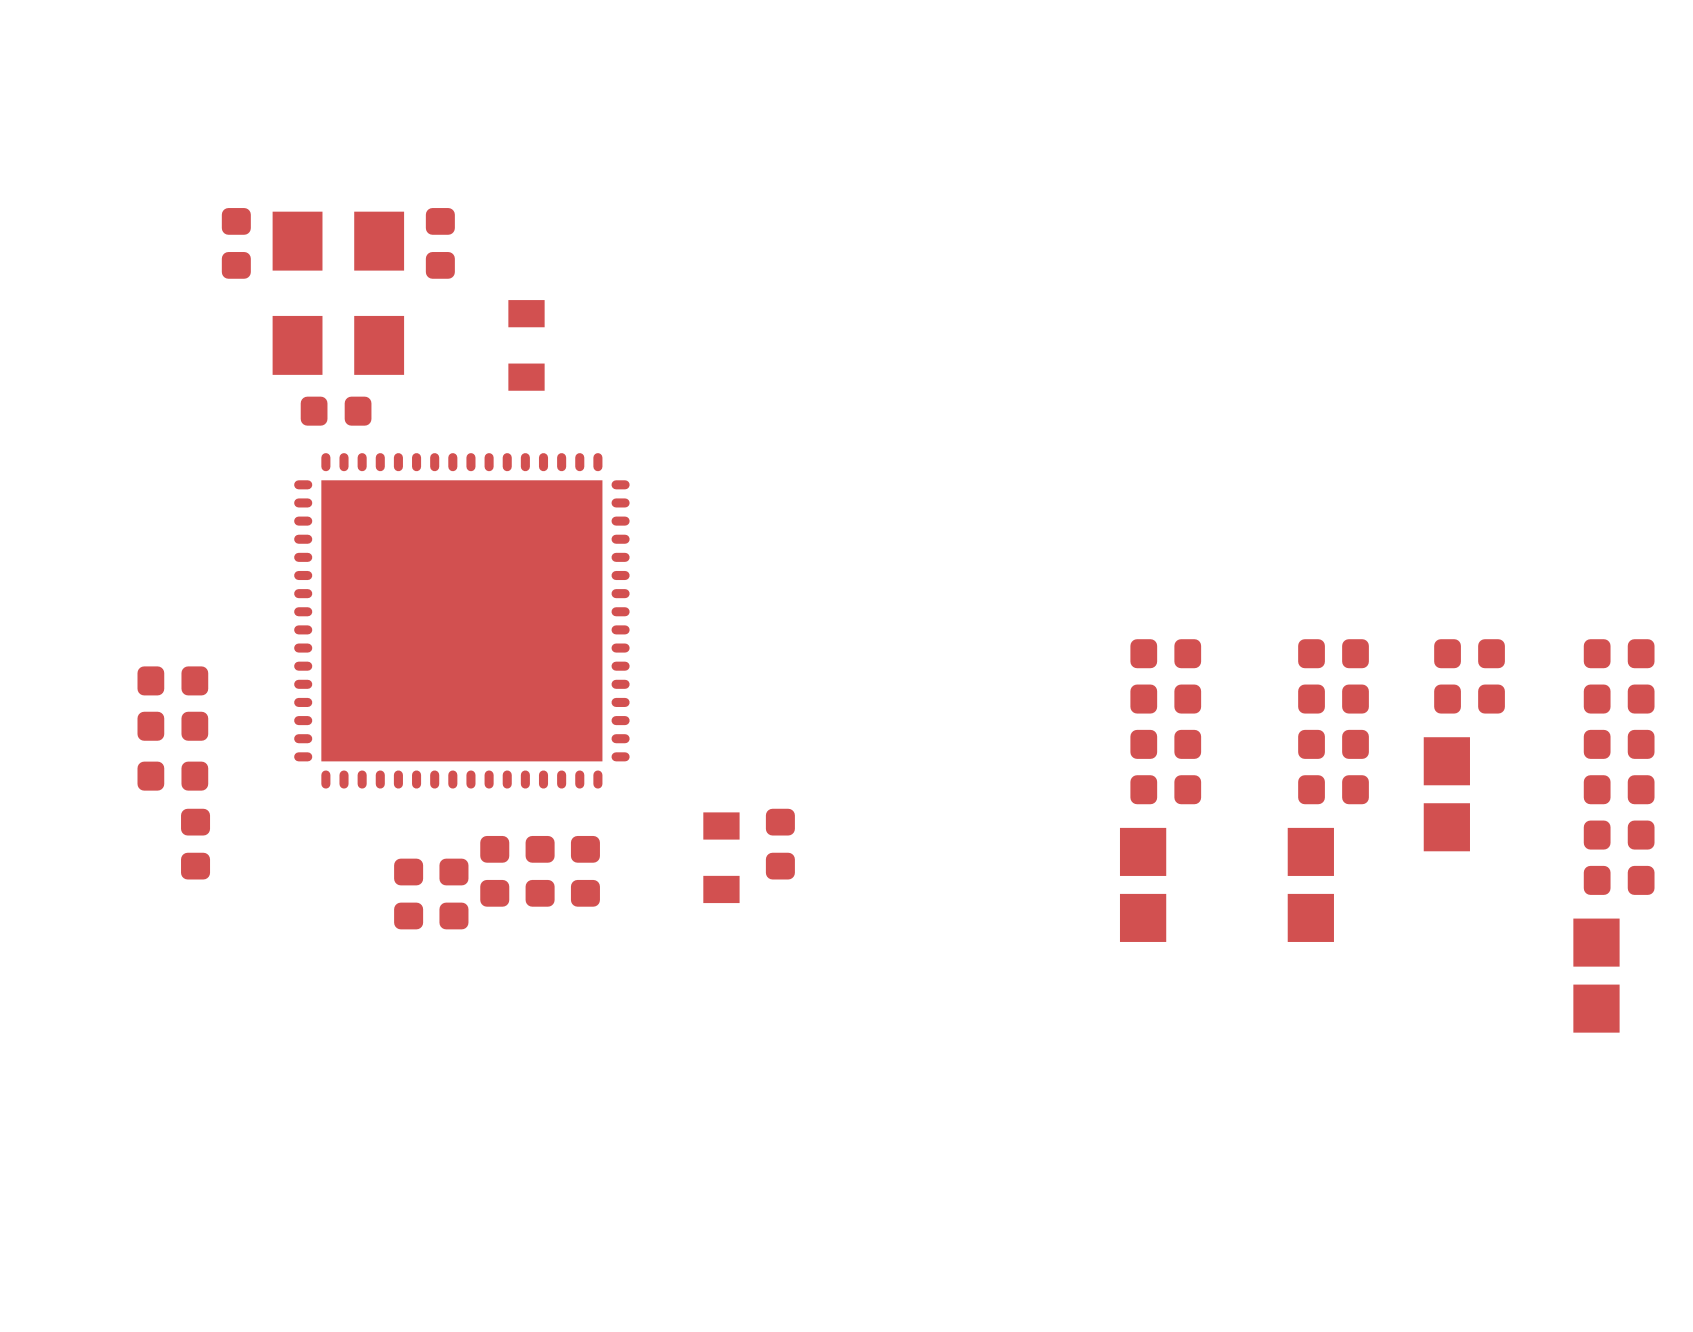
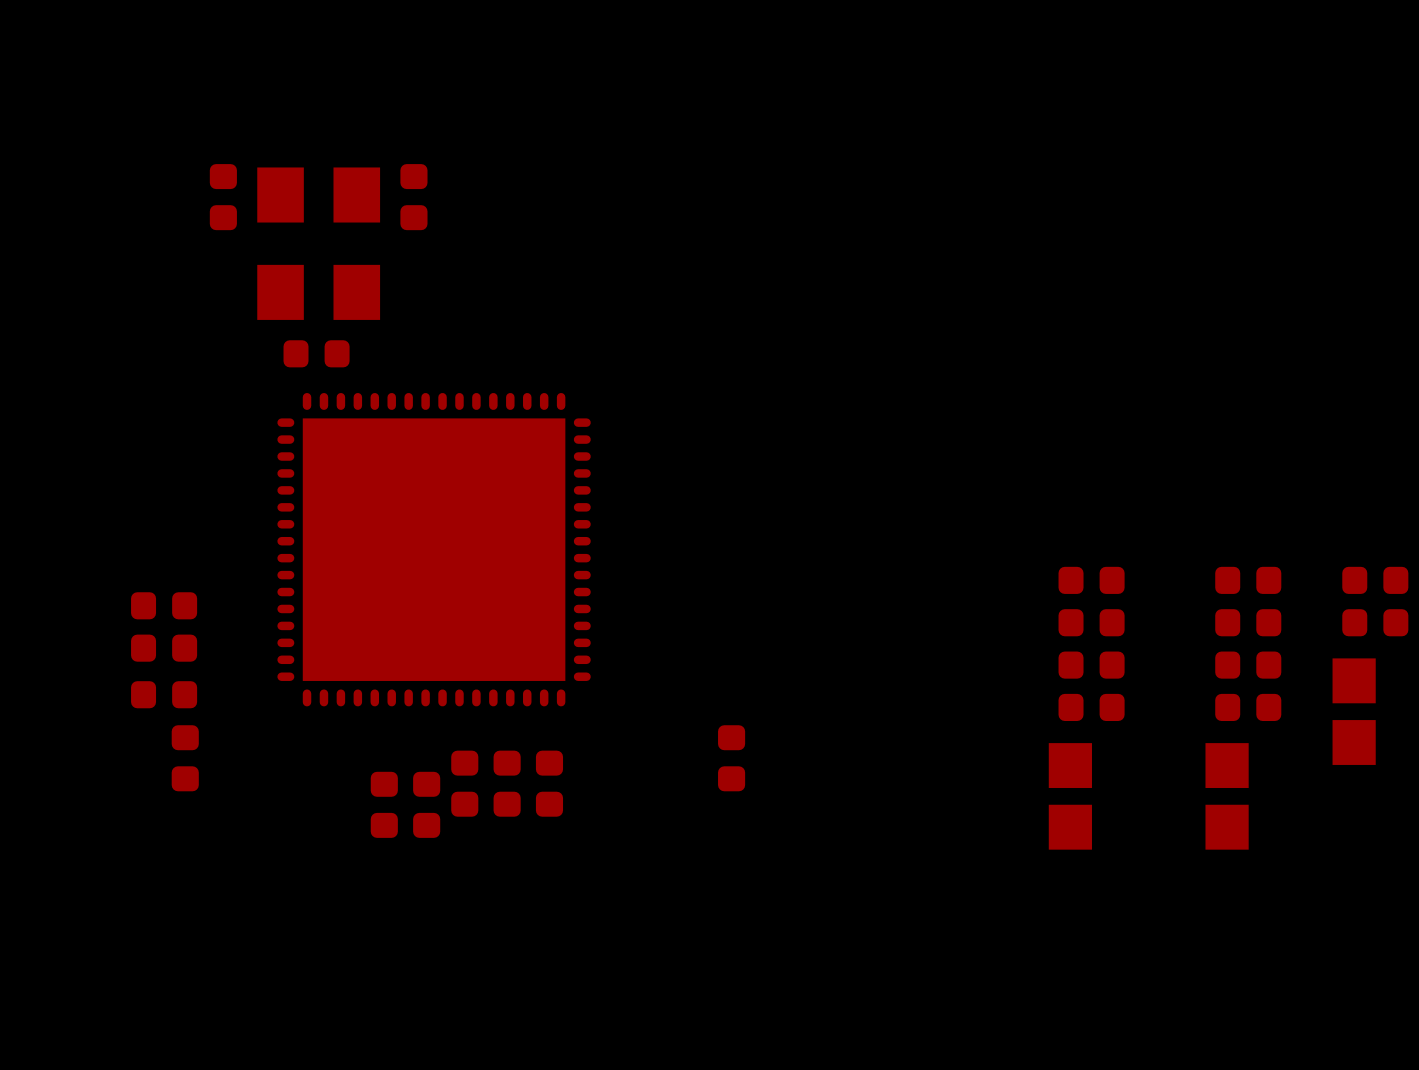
part: (526, 345) -> none
part: (721, 857) -> none

